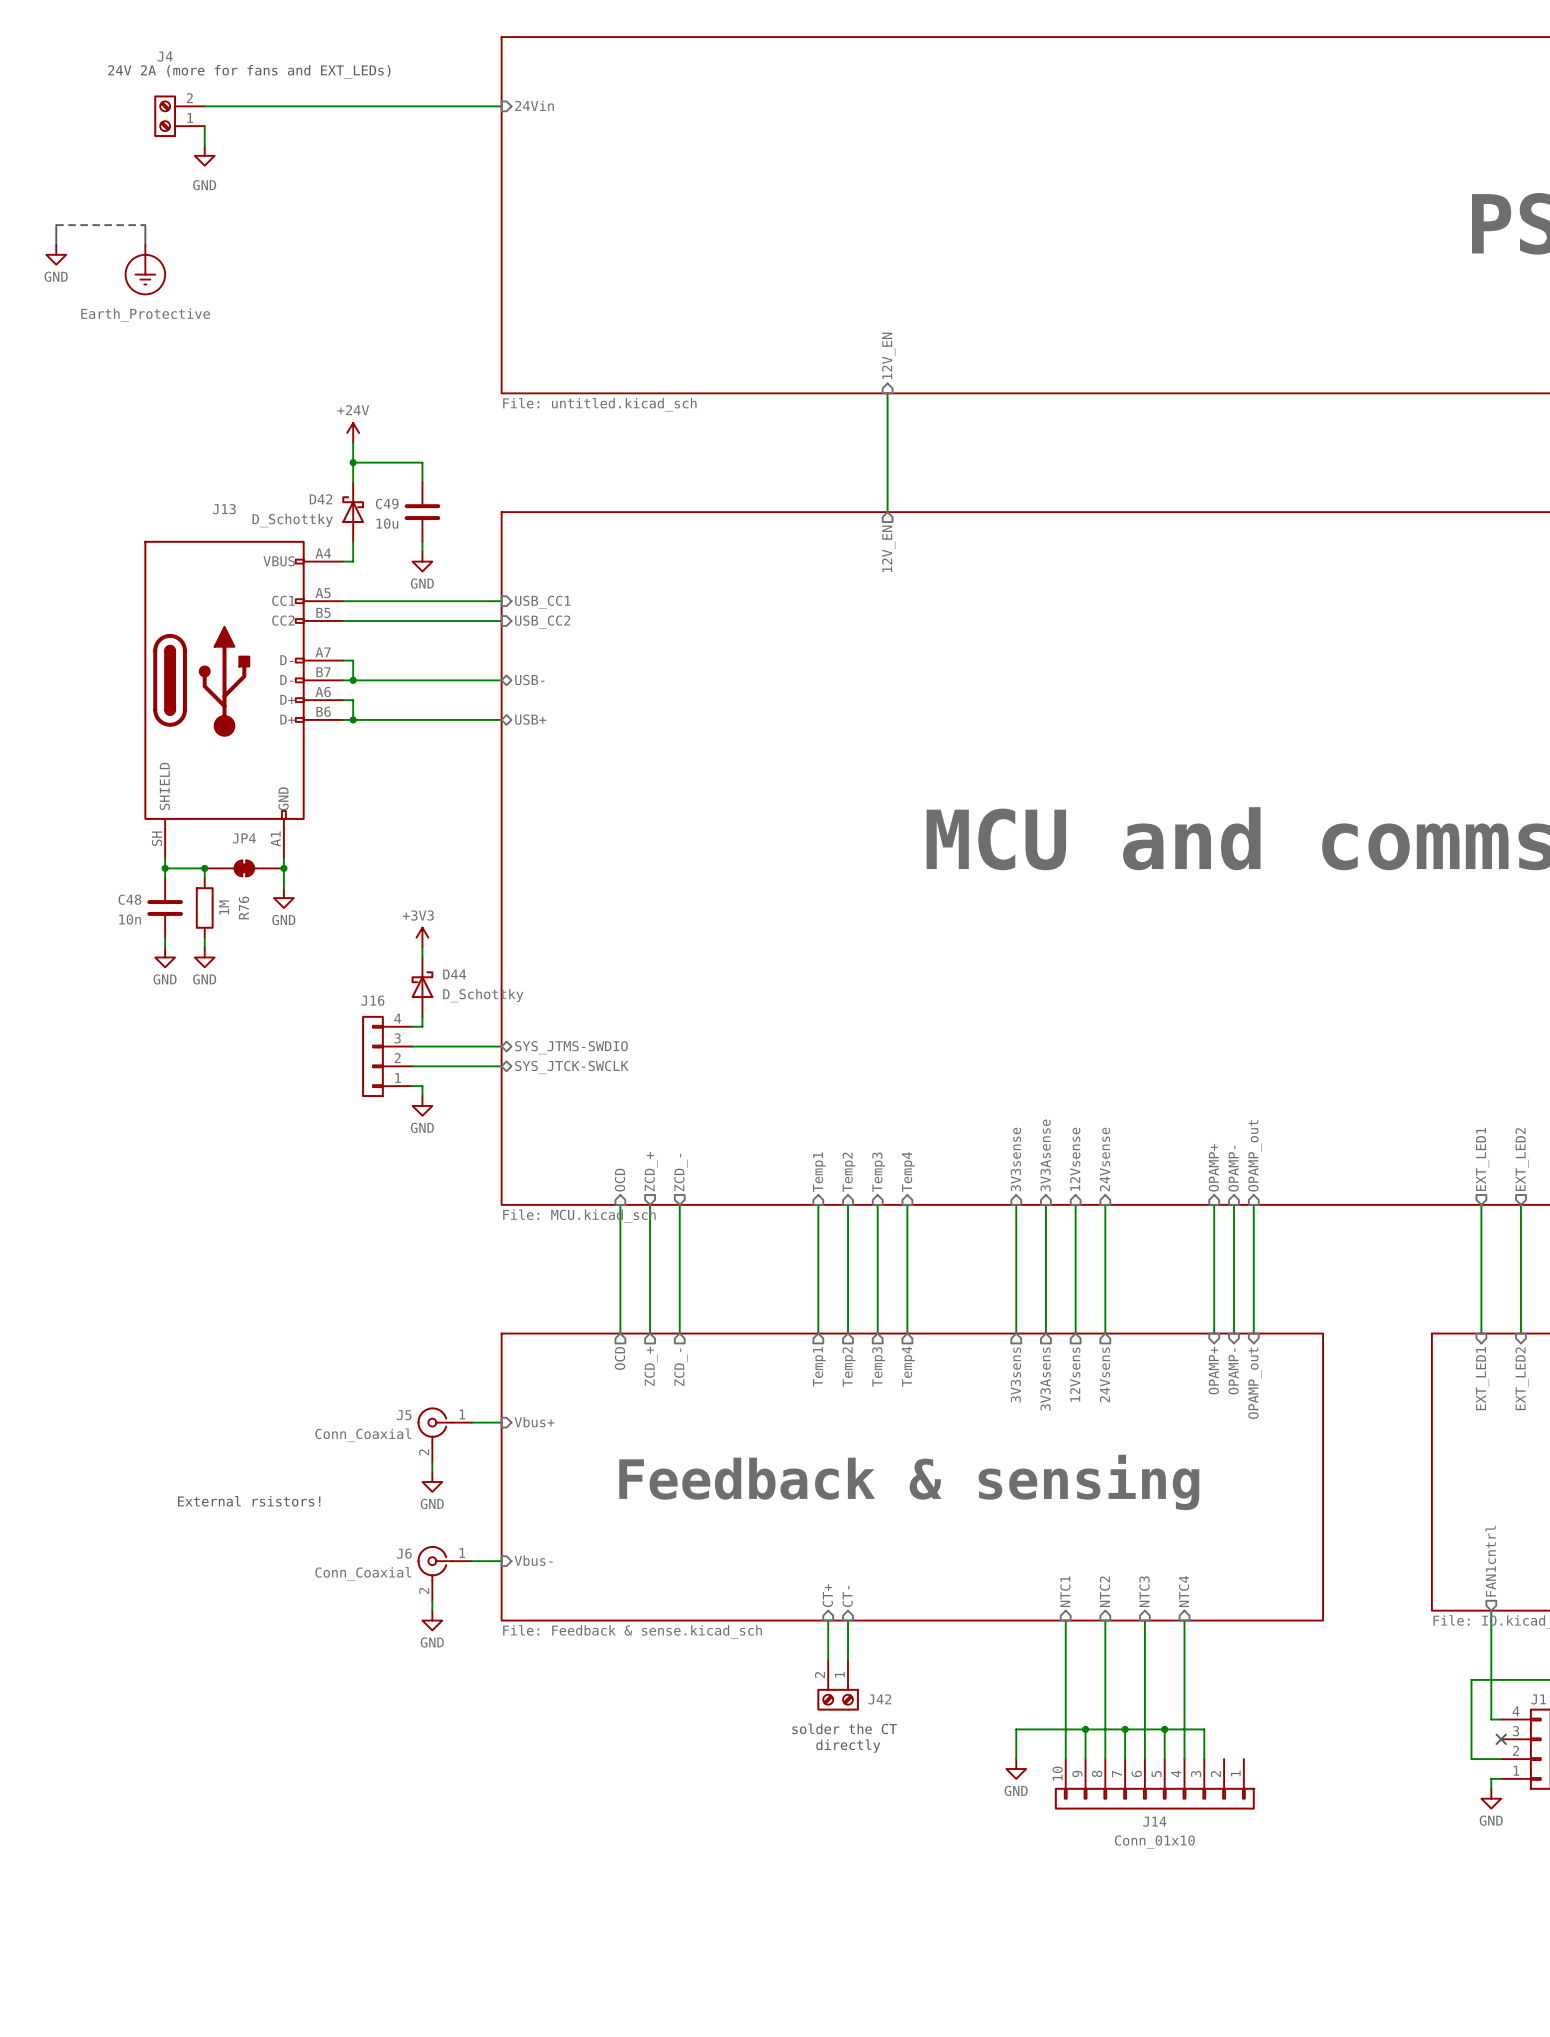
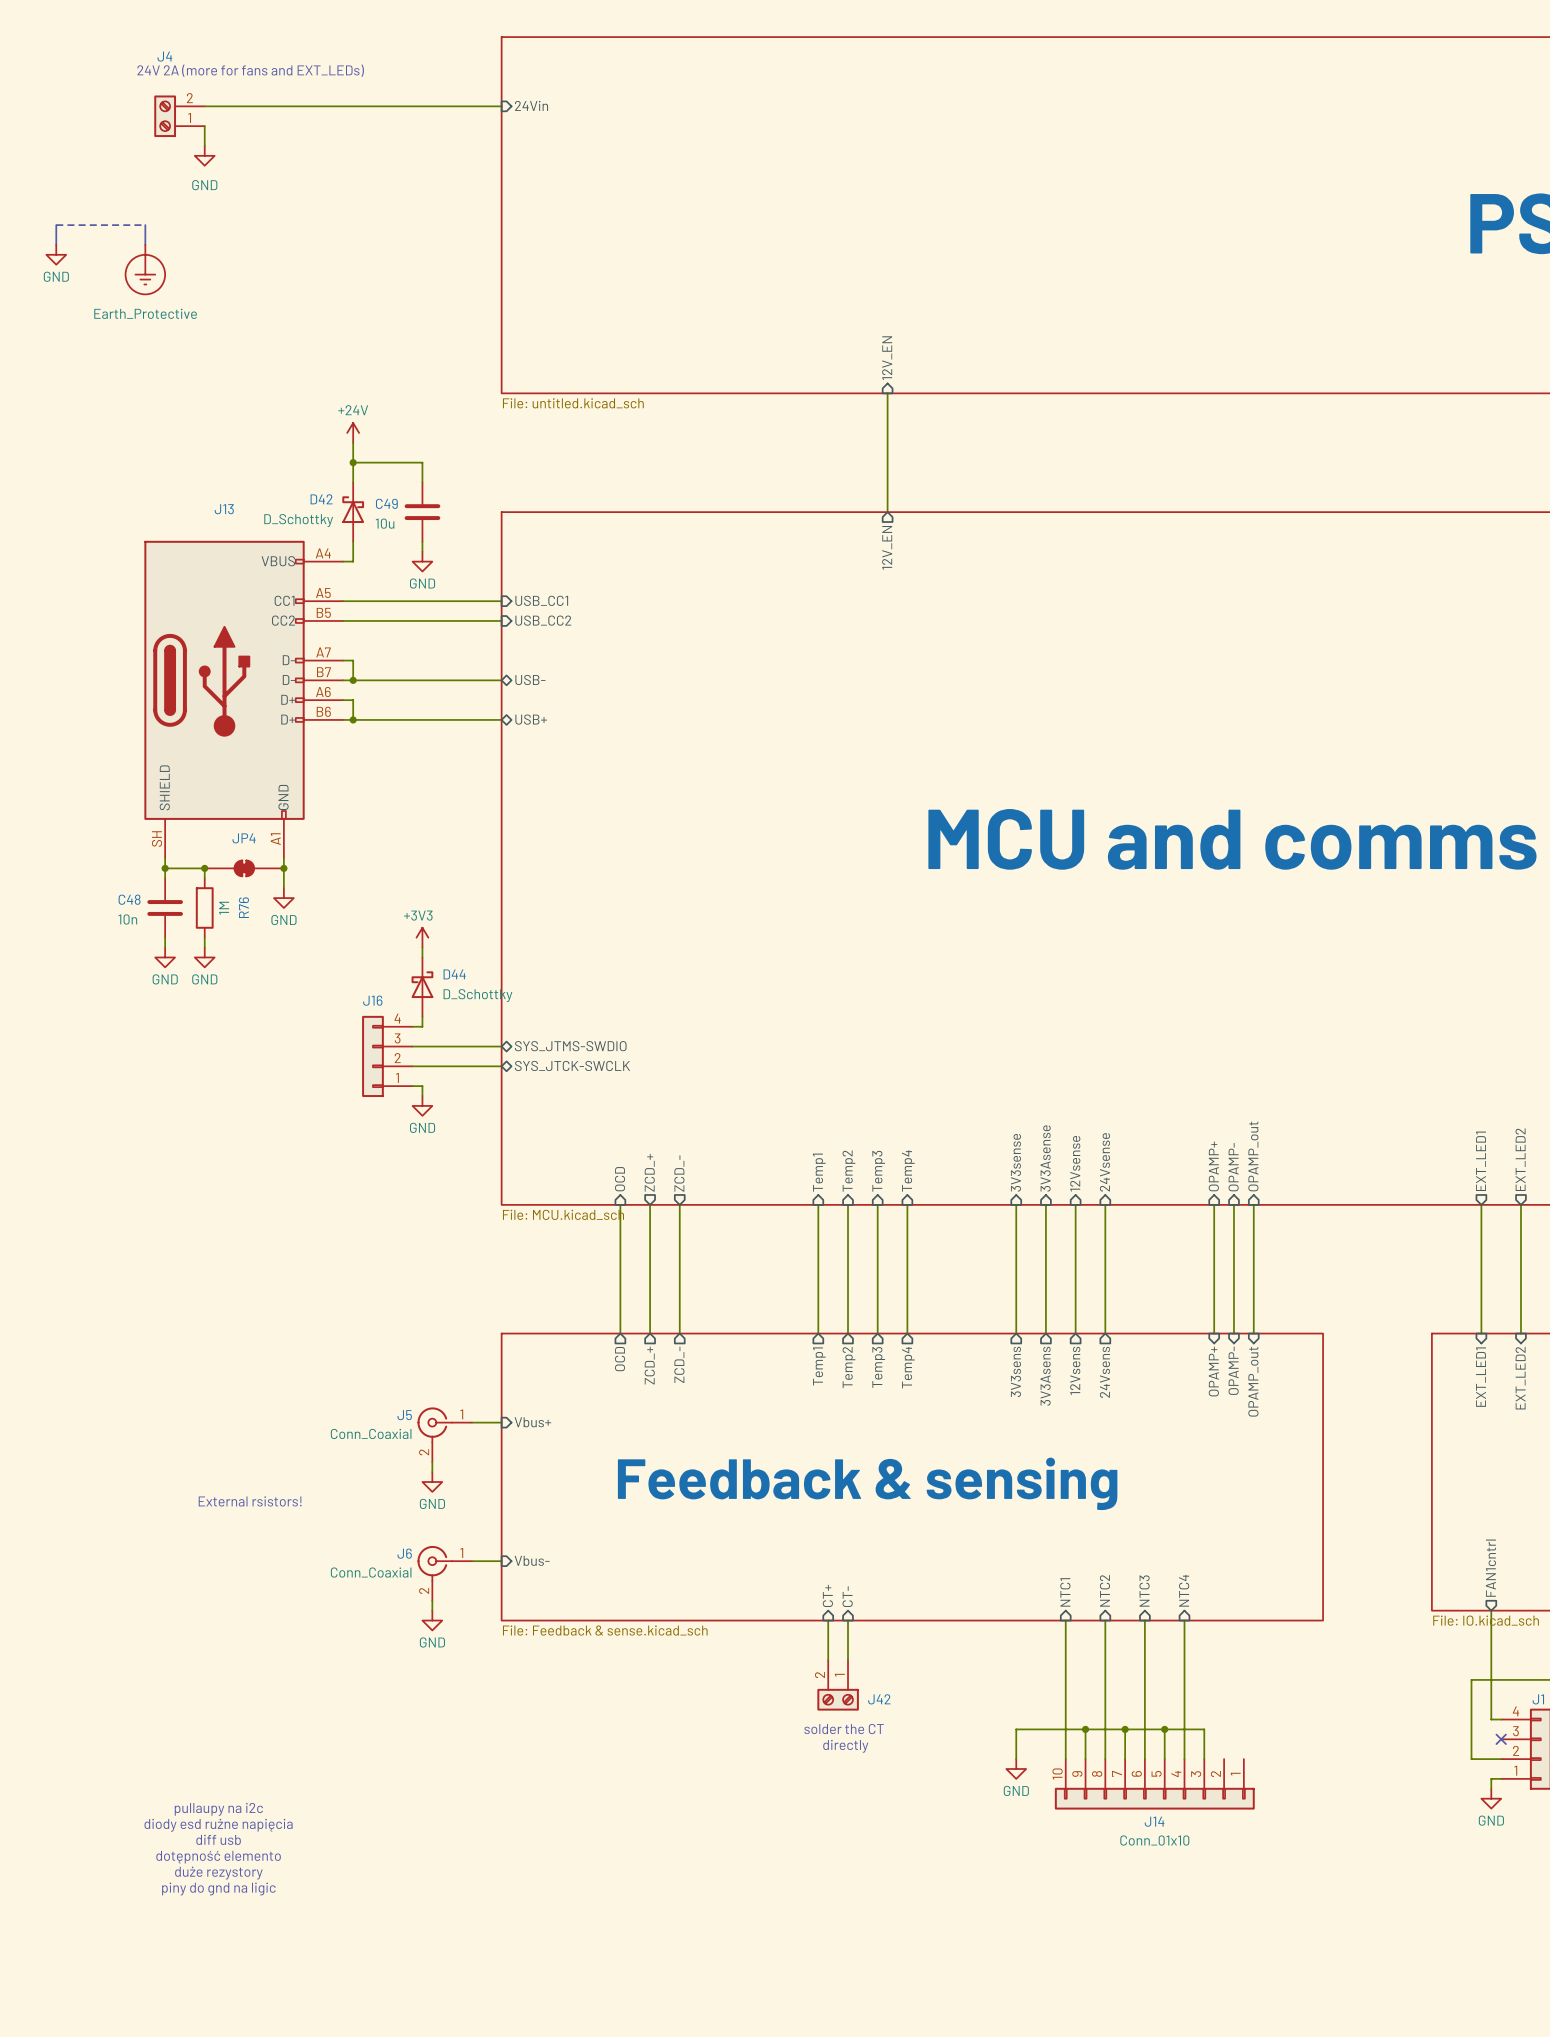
text: none -> pullaupy na i2c (218, 1809)
text: none -> diody esd rużne napięcia (218, 1825)
text: none -> diff usb (218, 1839)
text: none -> dotępność elemento (218, 1857)
text: none -> duże rezystory (218, 1873)
text: none -> piny do gnd na ligic (218, 1889)

